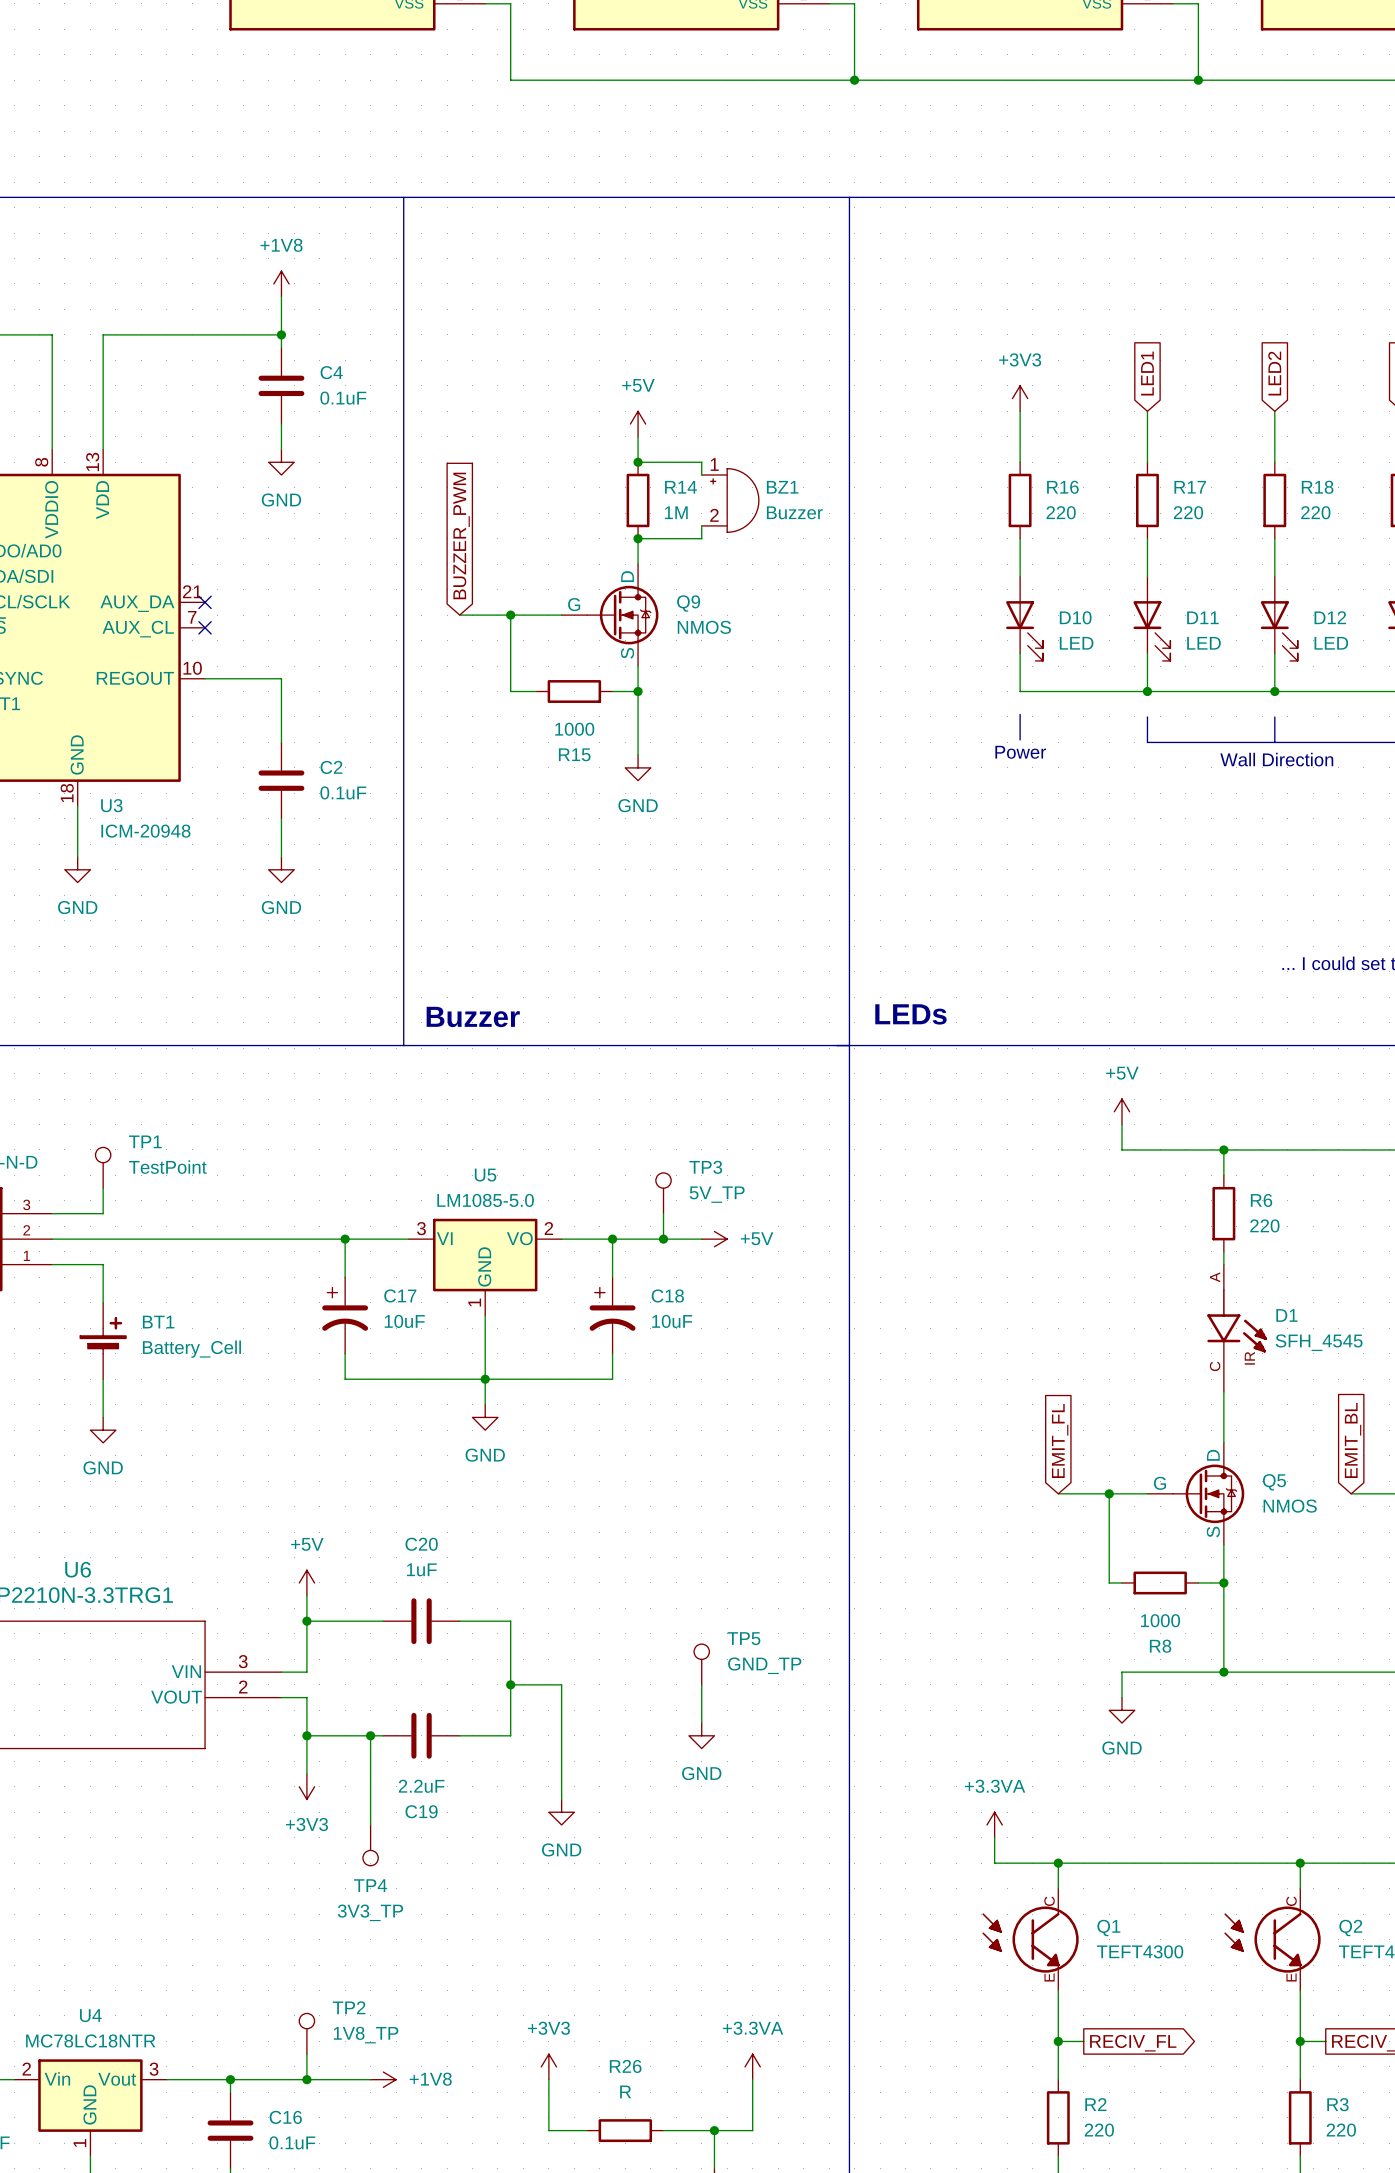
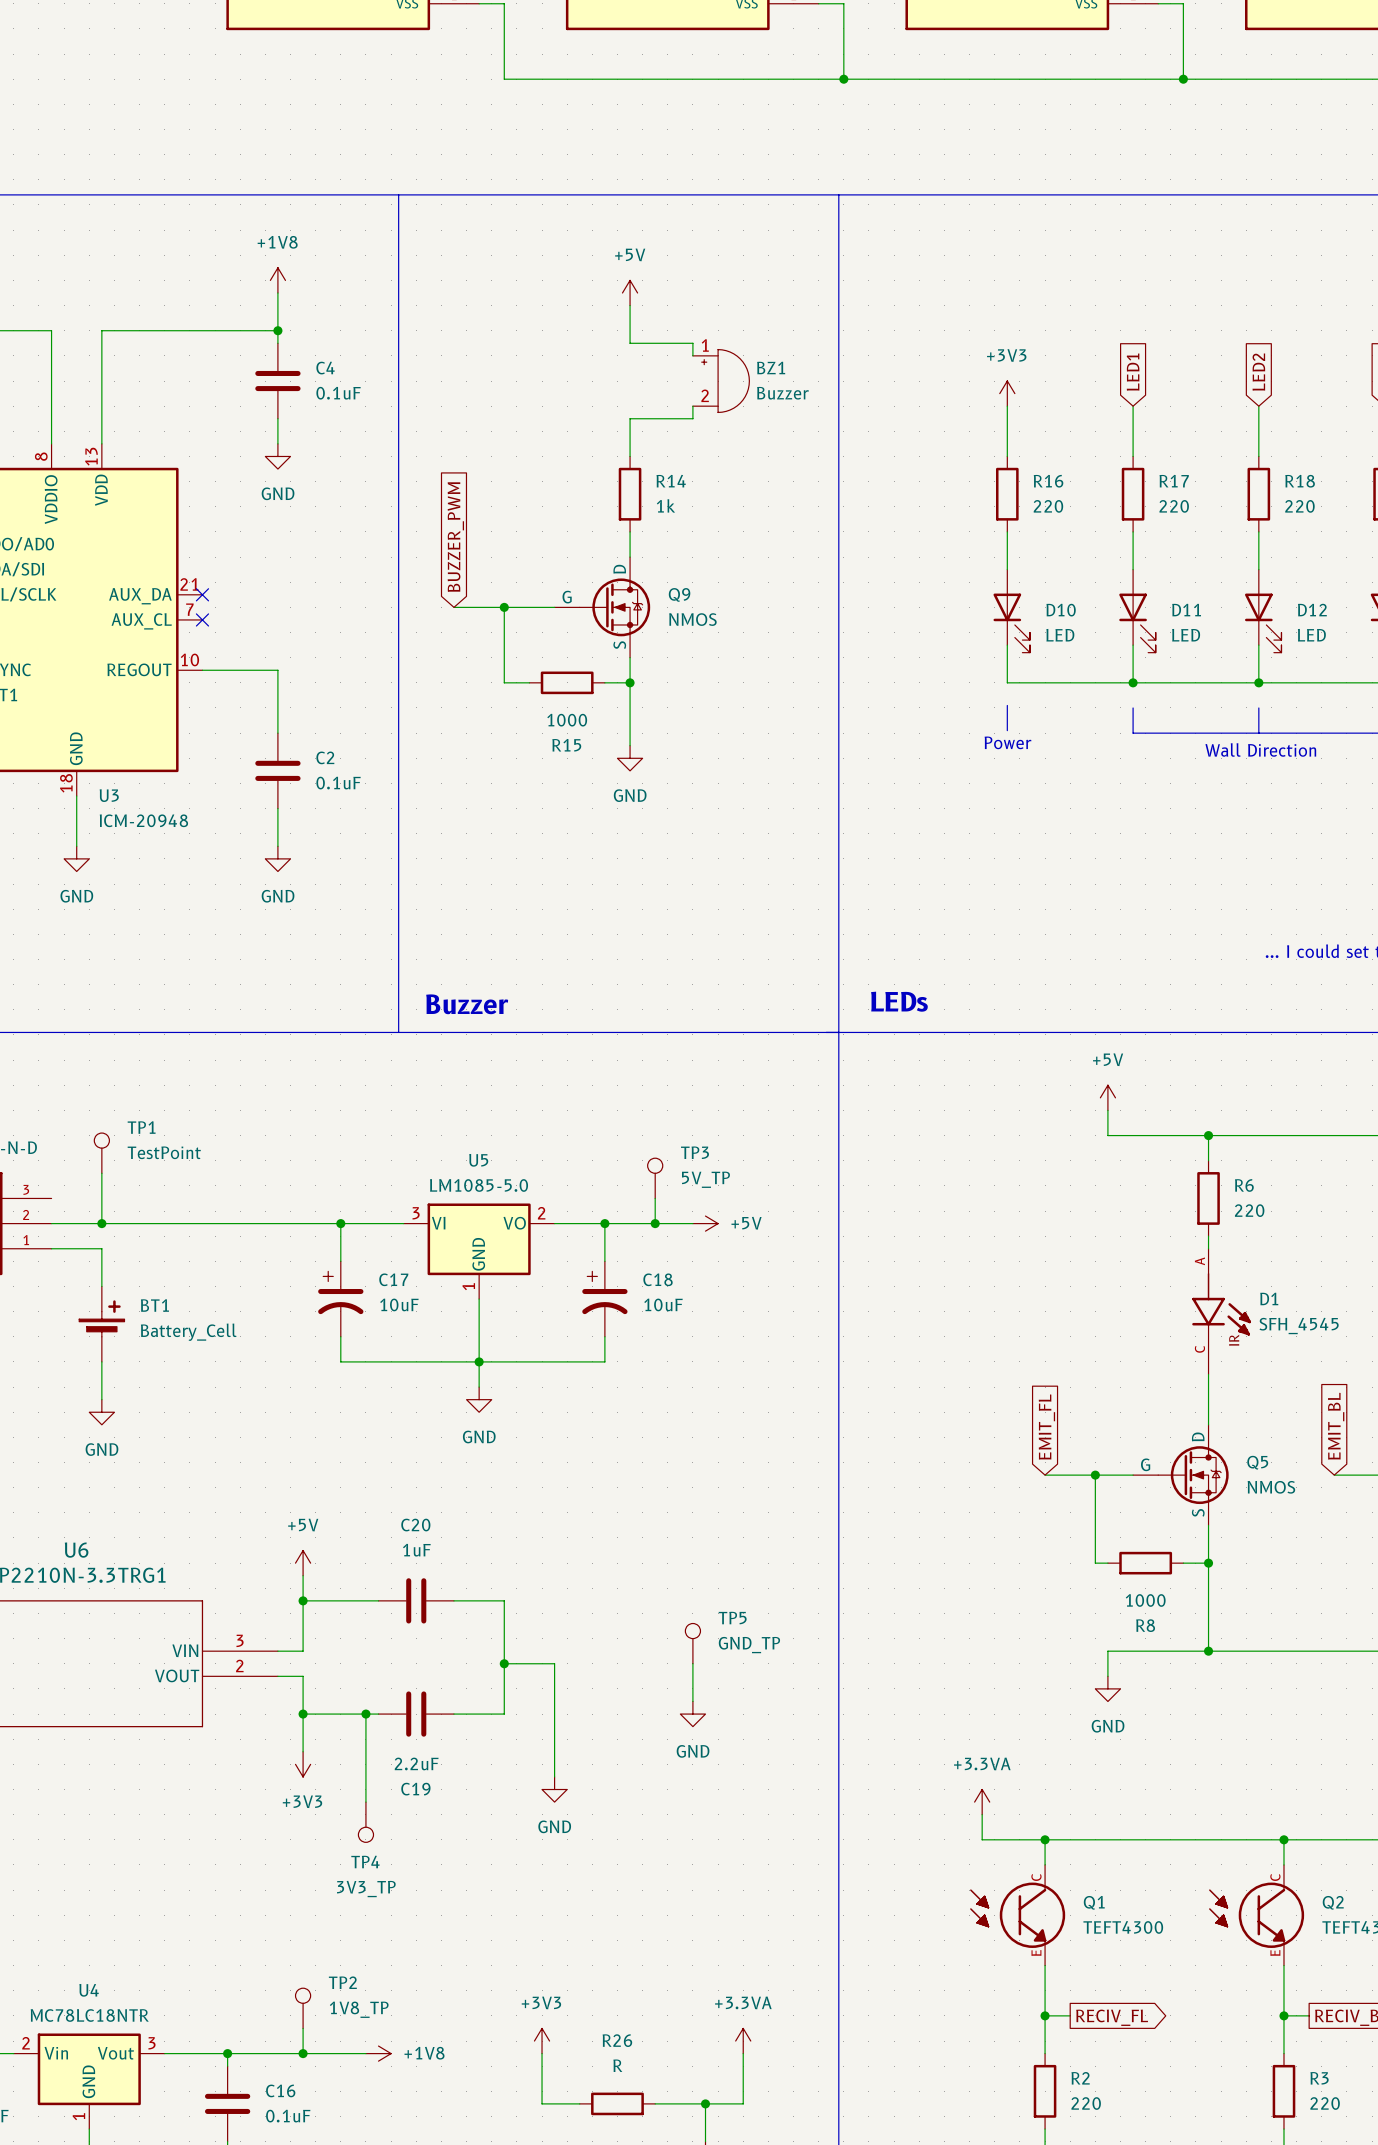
wire: none -> (630, 305) (630, 343) (692, 343) (692, 355)
wire: none -> (692, 406) (692, 418) (630, 418) (630, 431)
power symbol position: +5V (638, 424) -> +5V (630, 292)
wire: (638, 462) (701, 462) (701, 475) -> none
junction: (638, 462) -> none
BZ1 position: (730, 500) -> (721, 381)
R14 value: 1M (676, 512) -> 1k (665, 505)
wire: (701, 525) (701, 538) (638, 538) -> none
junction: (638, 538) -> none
wire: (52, 1213) (103, 1213) -> (101, 1223) (101, 1198)
junction: none -> (101, 1223)

